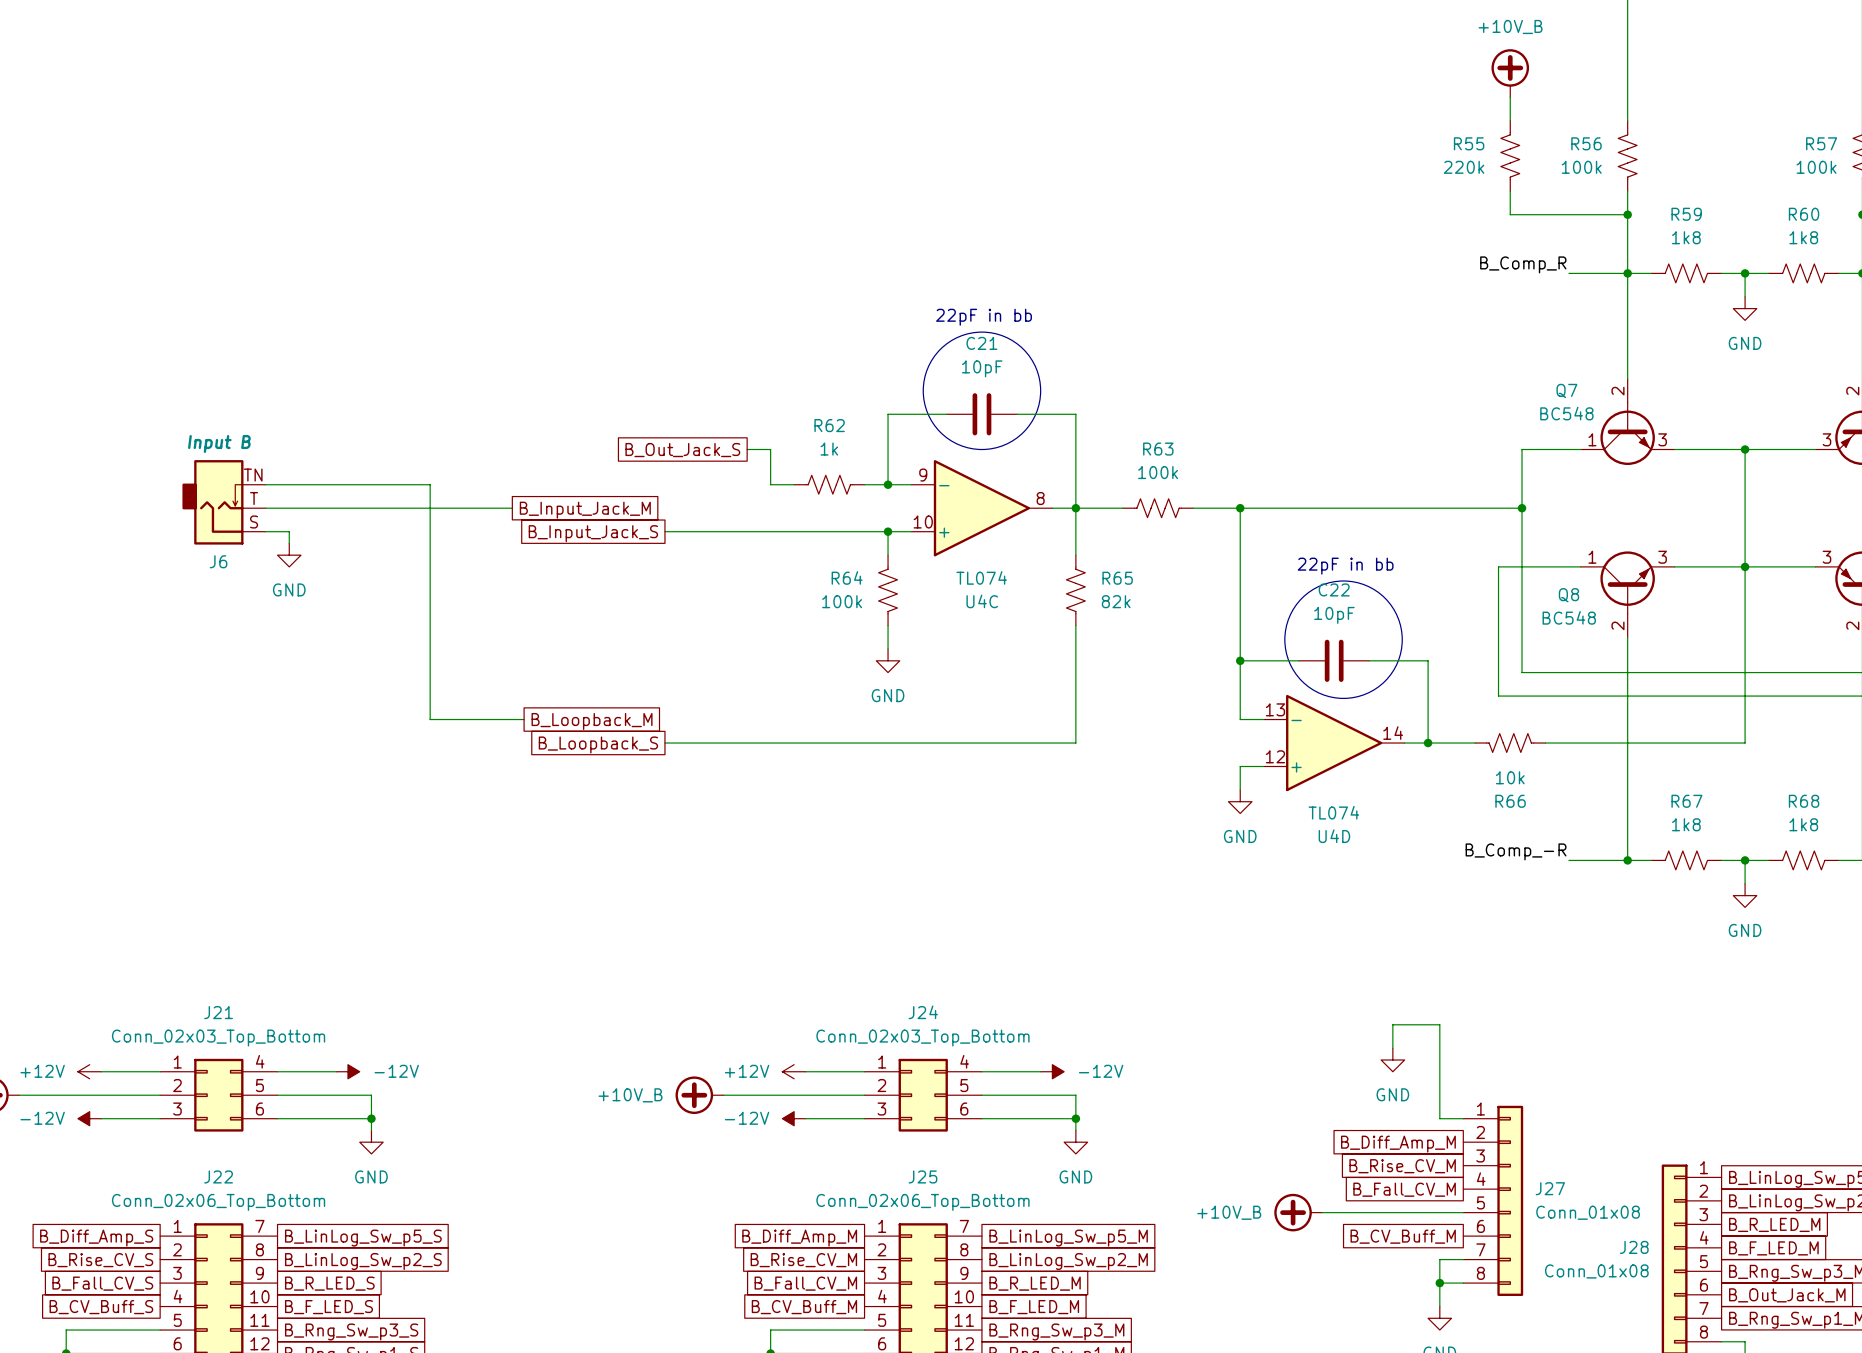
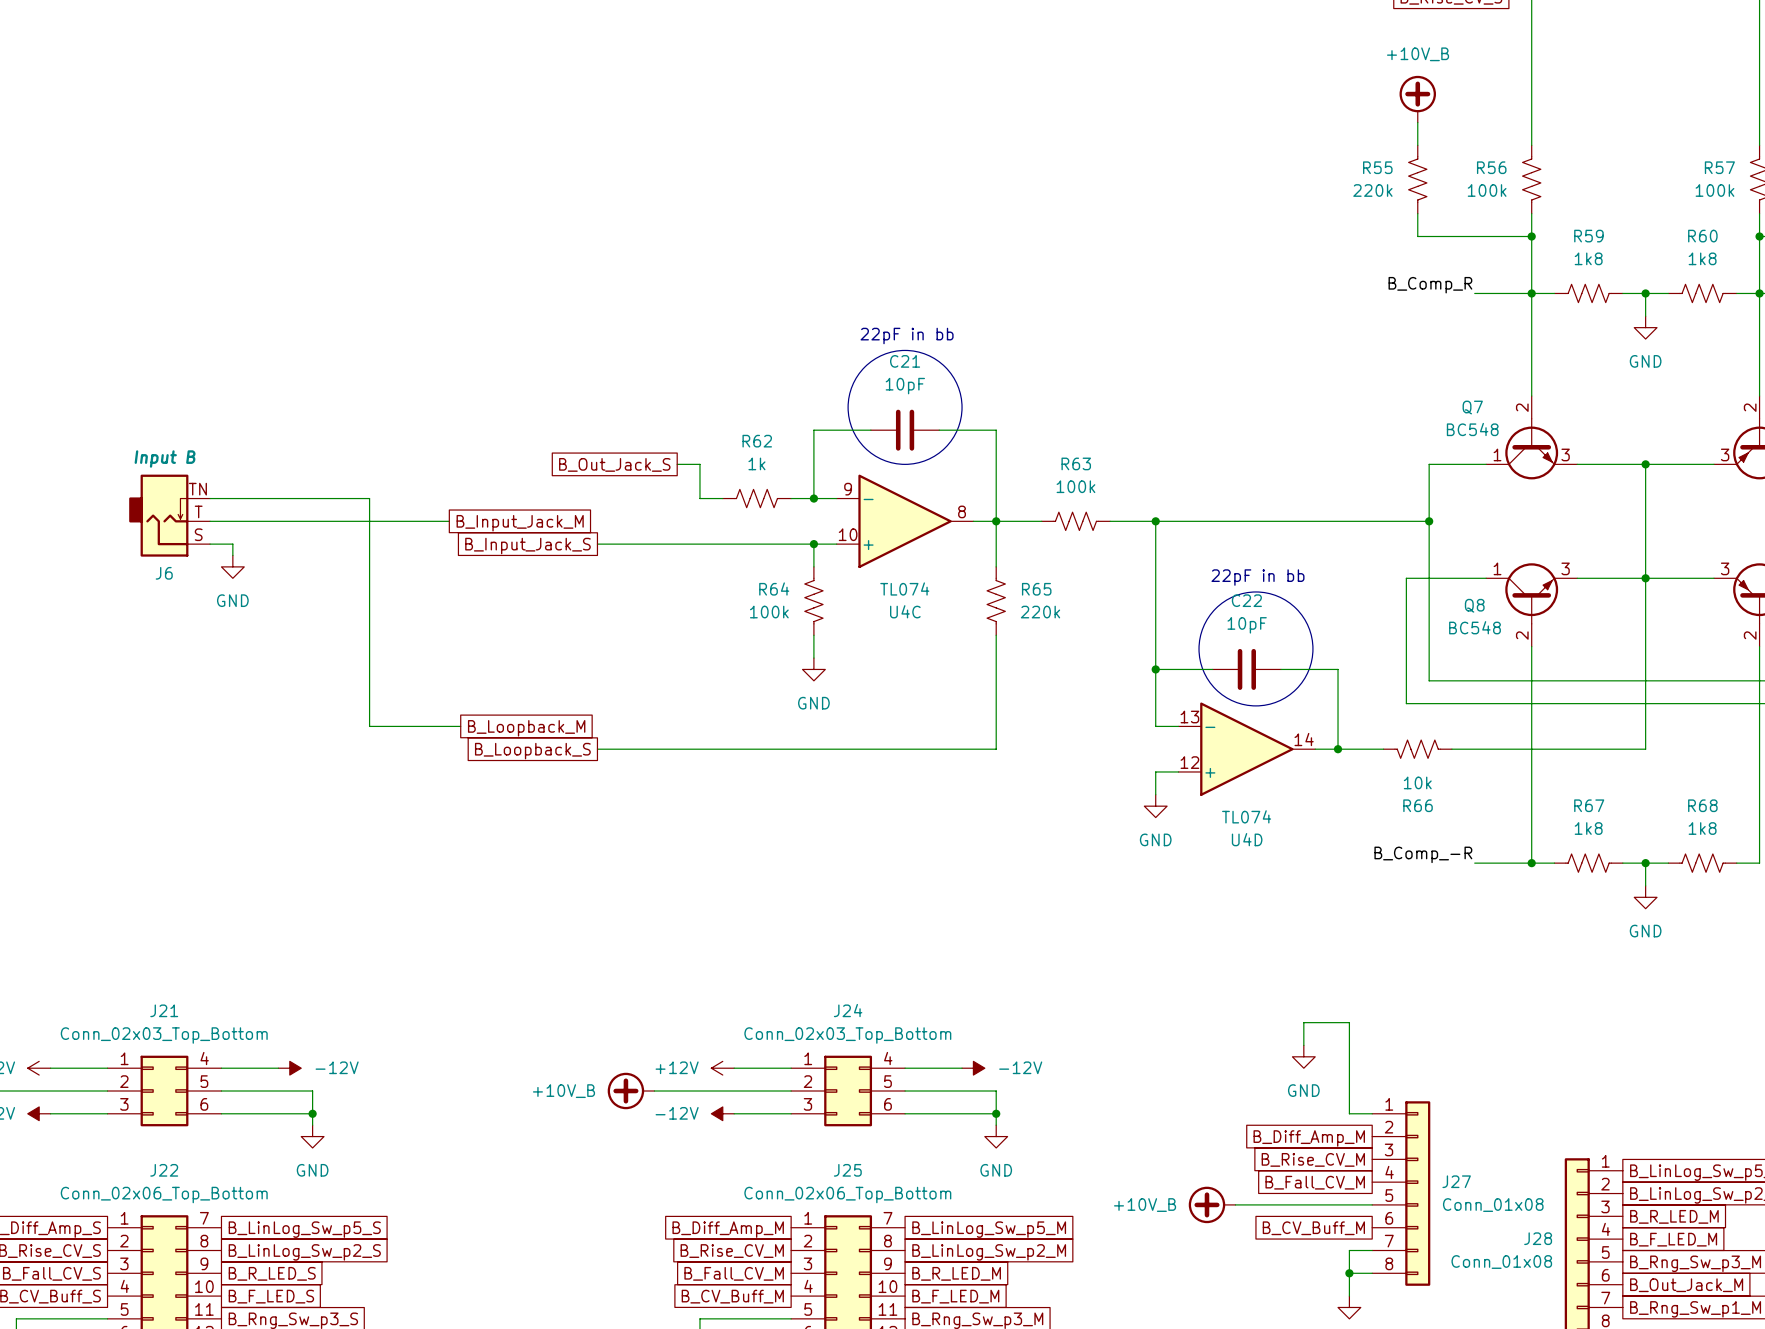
R65 value: 82k (1116, 601) -> 220k (1040, 612)

